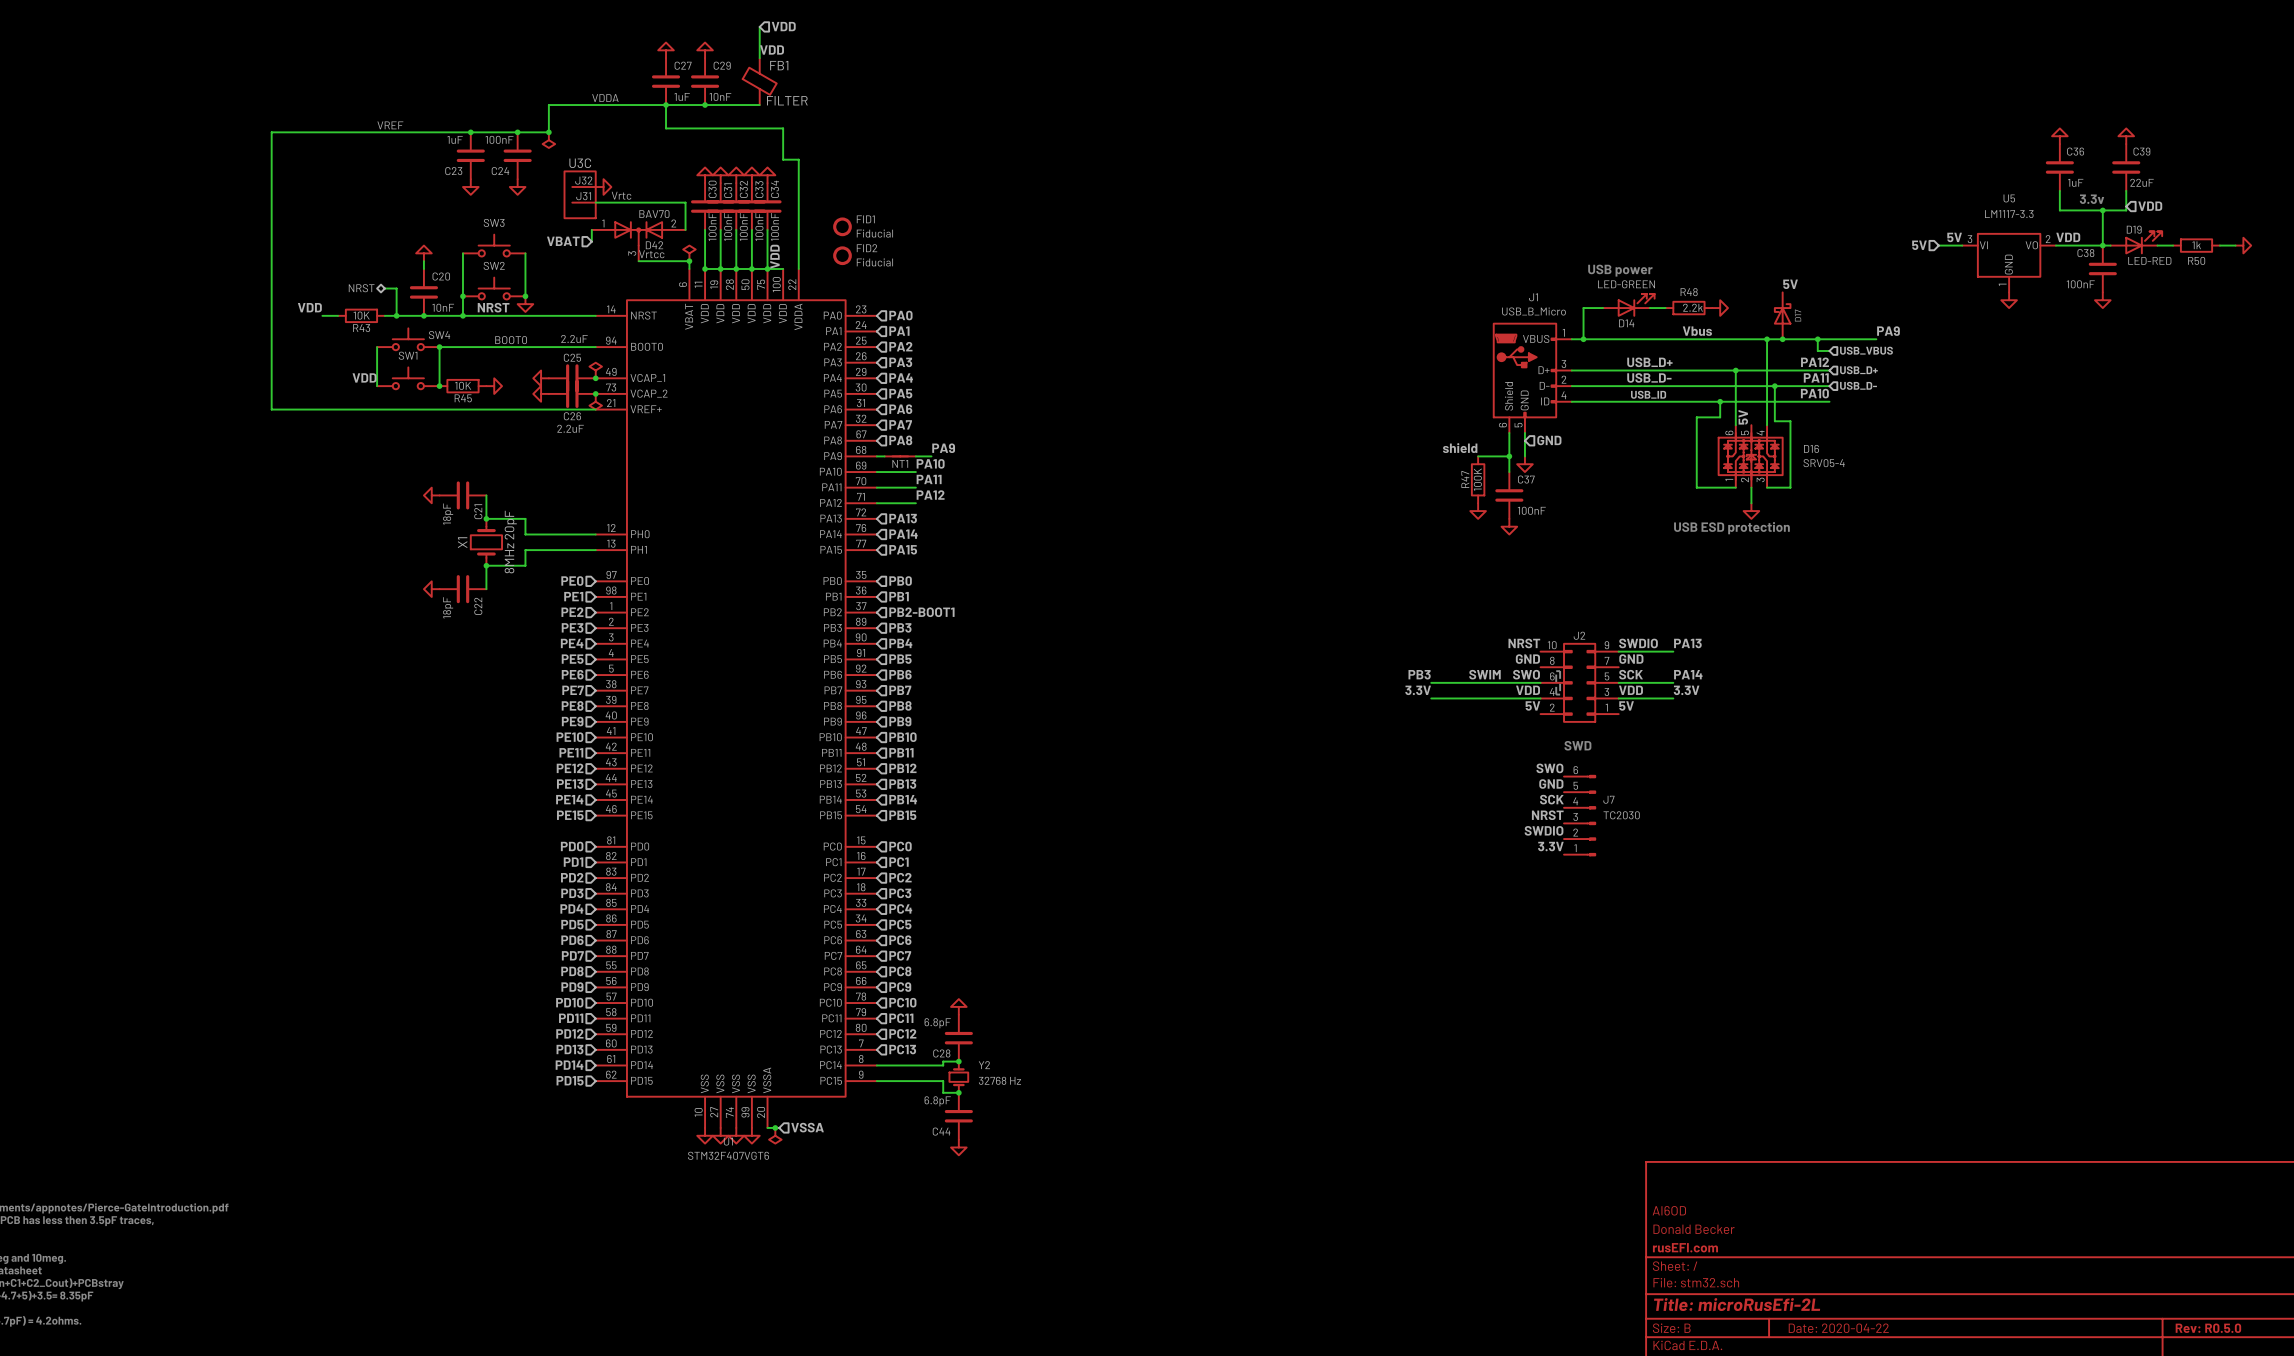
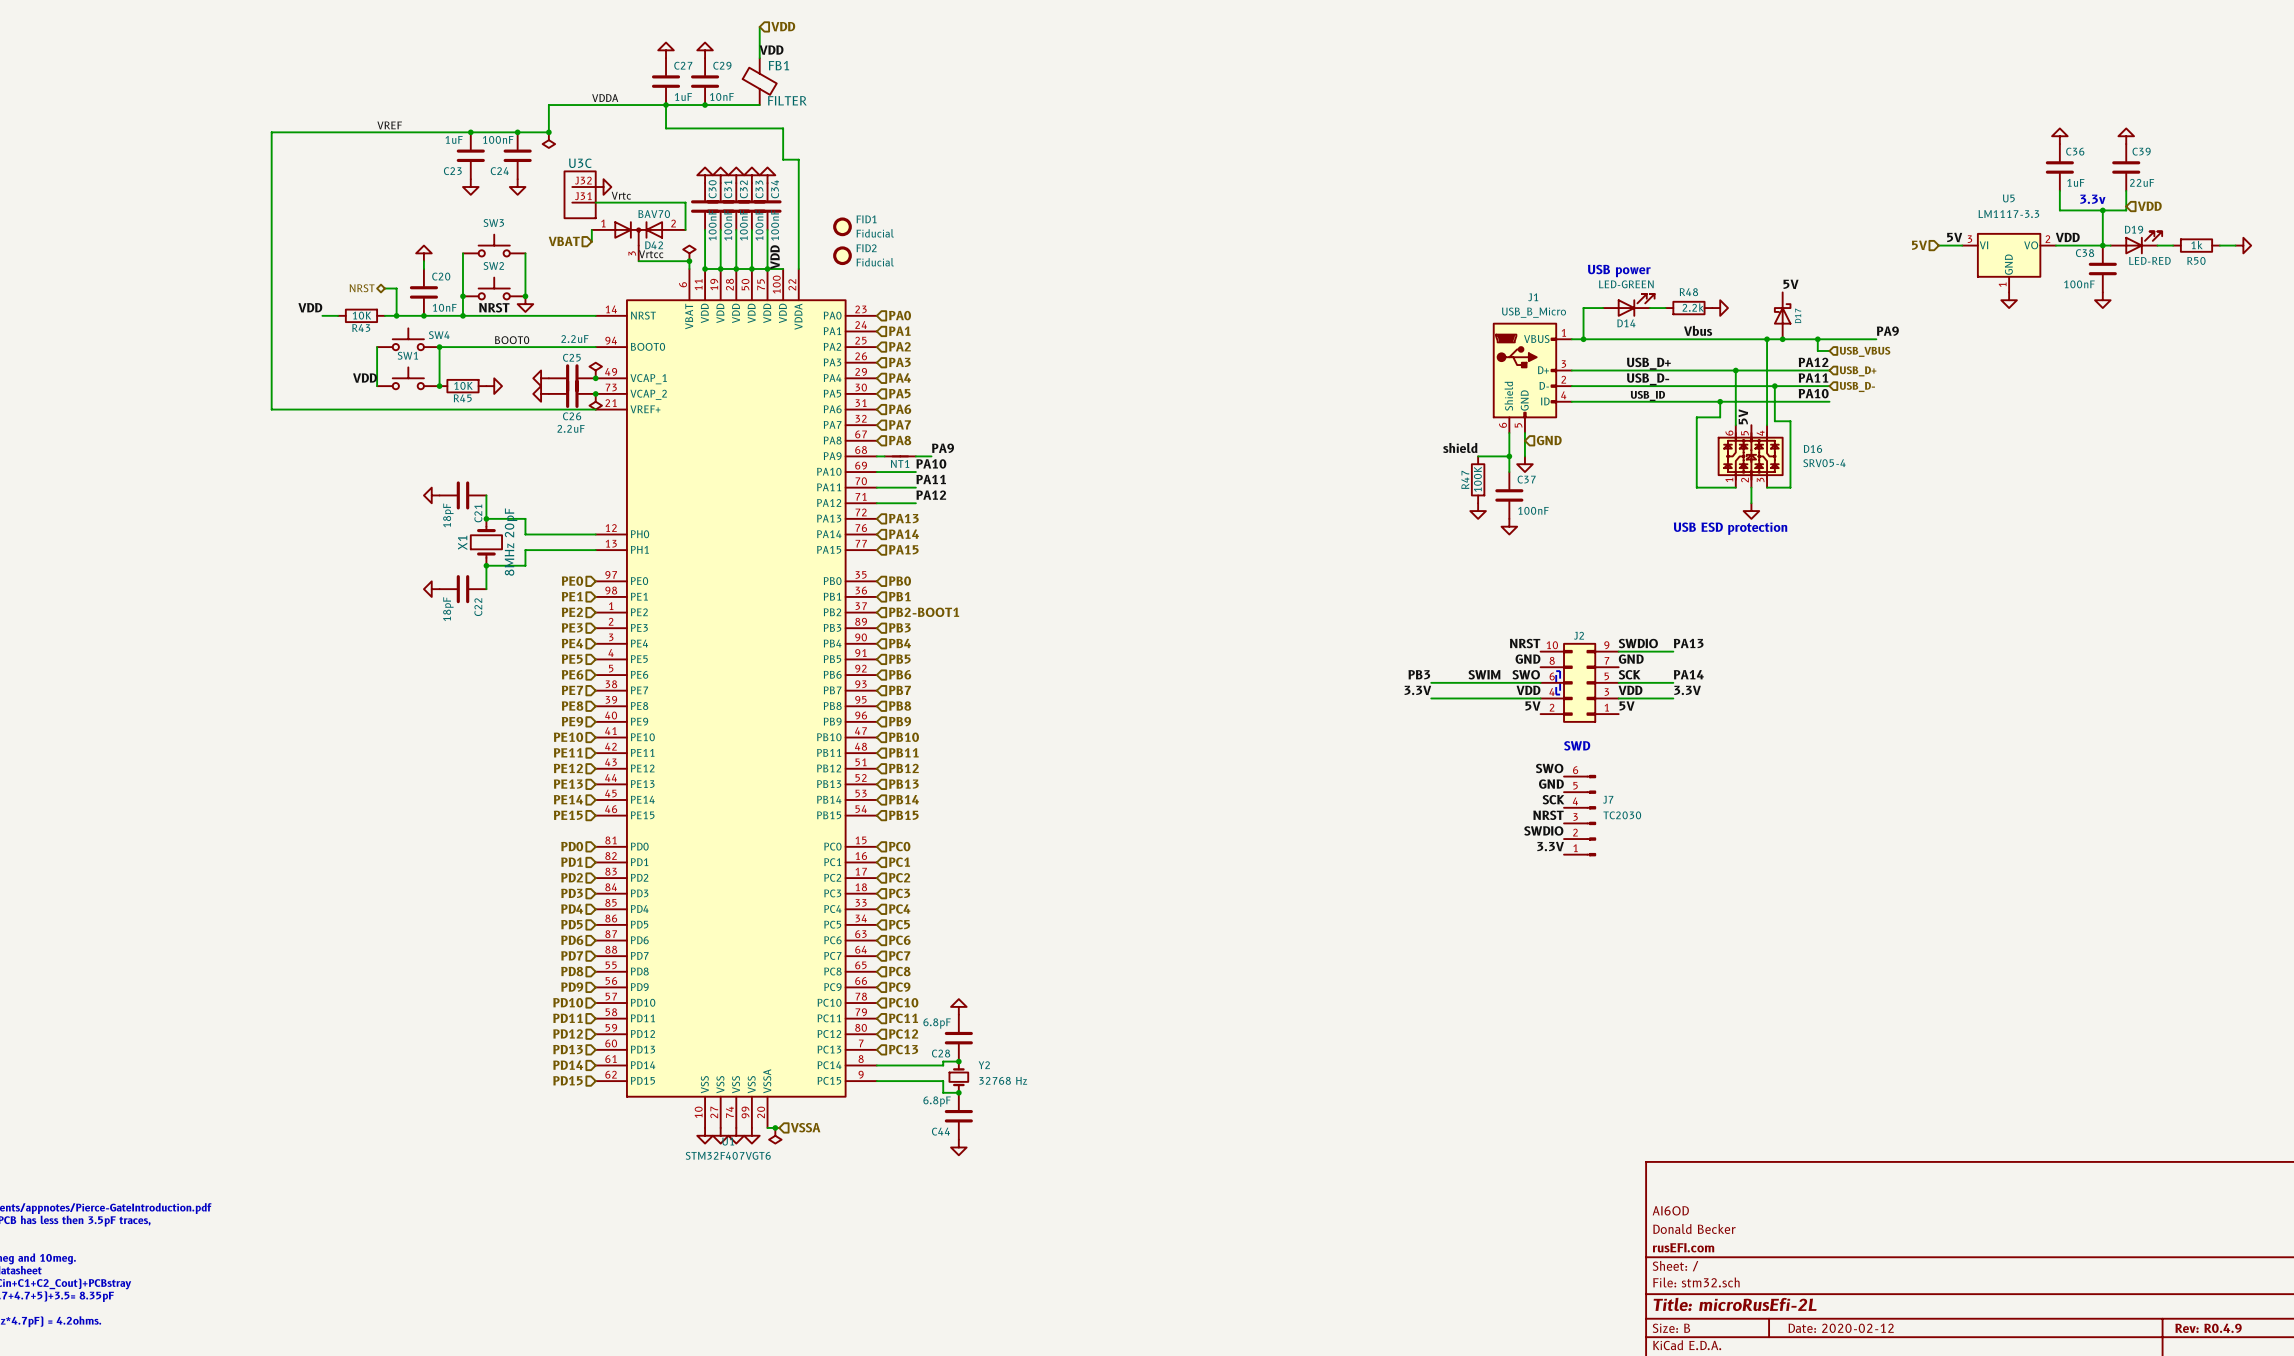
title block: Date: 2020-04-22 (1838, 1328) -> Date: 2020-02-12 (1841, 1328)
title block: Rev: R0.5.0 (2208, 1328) -> Rev: R0.4.9 (2208, 1328)

